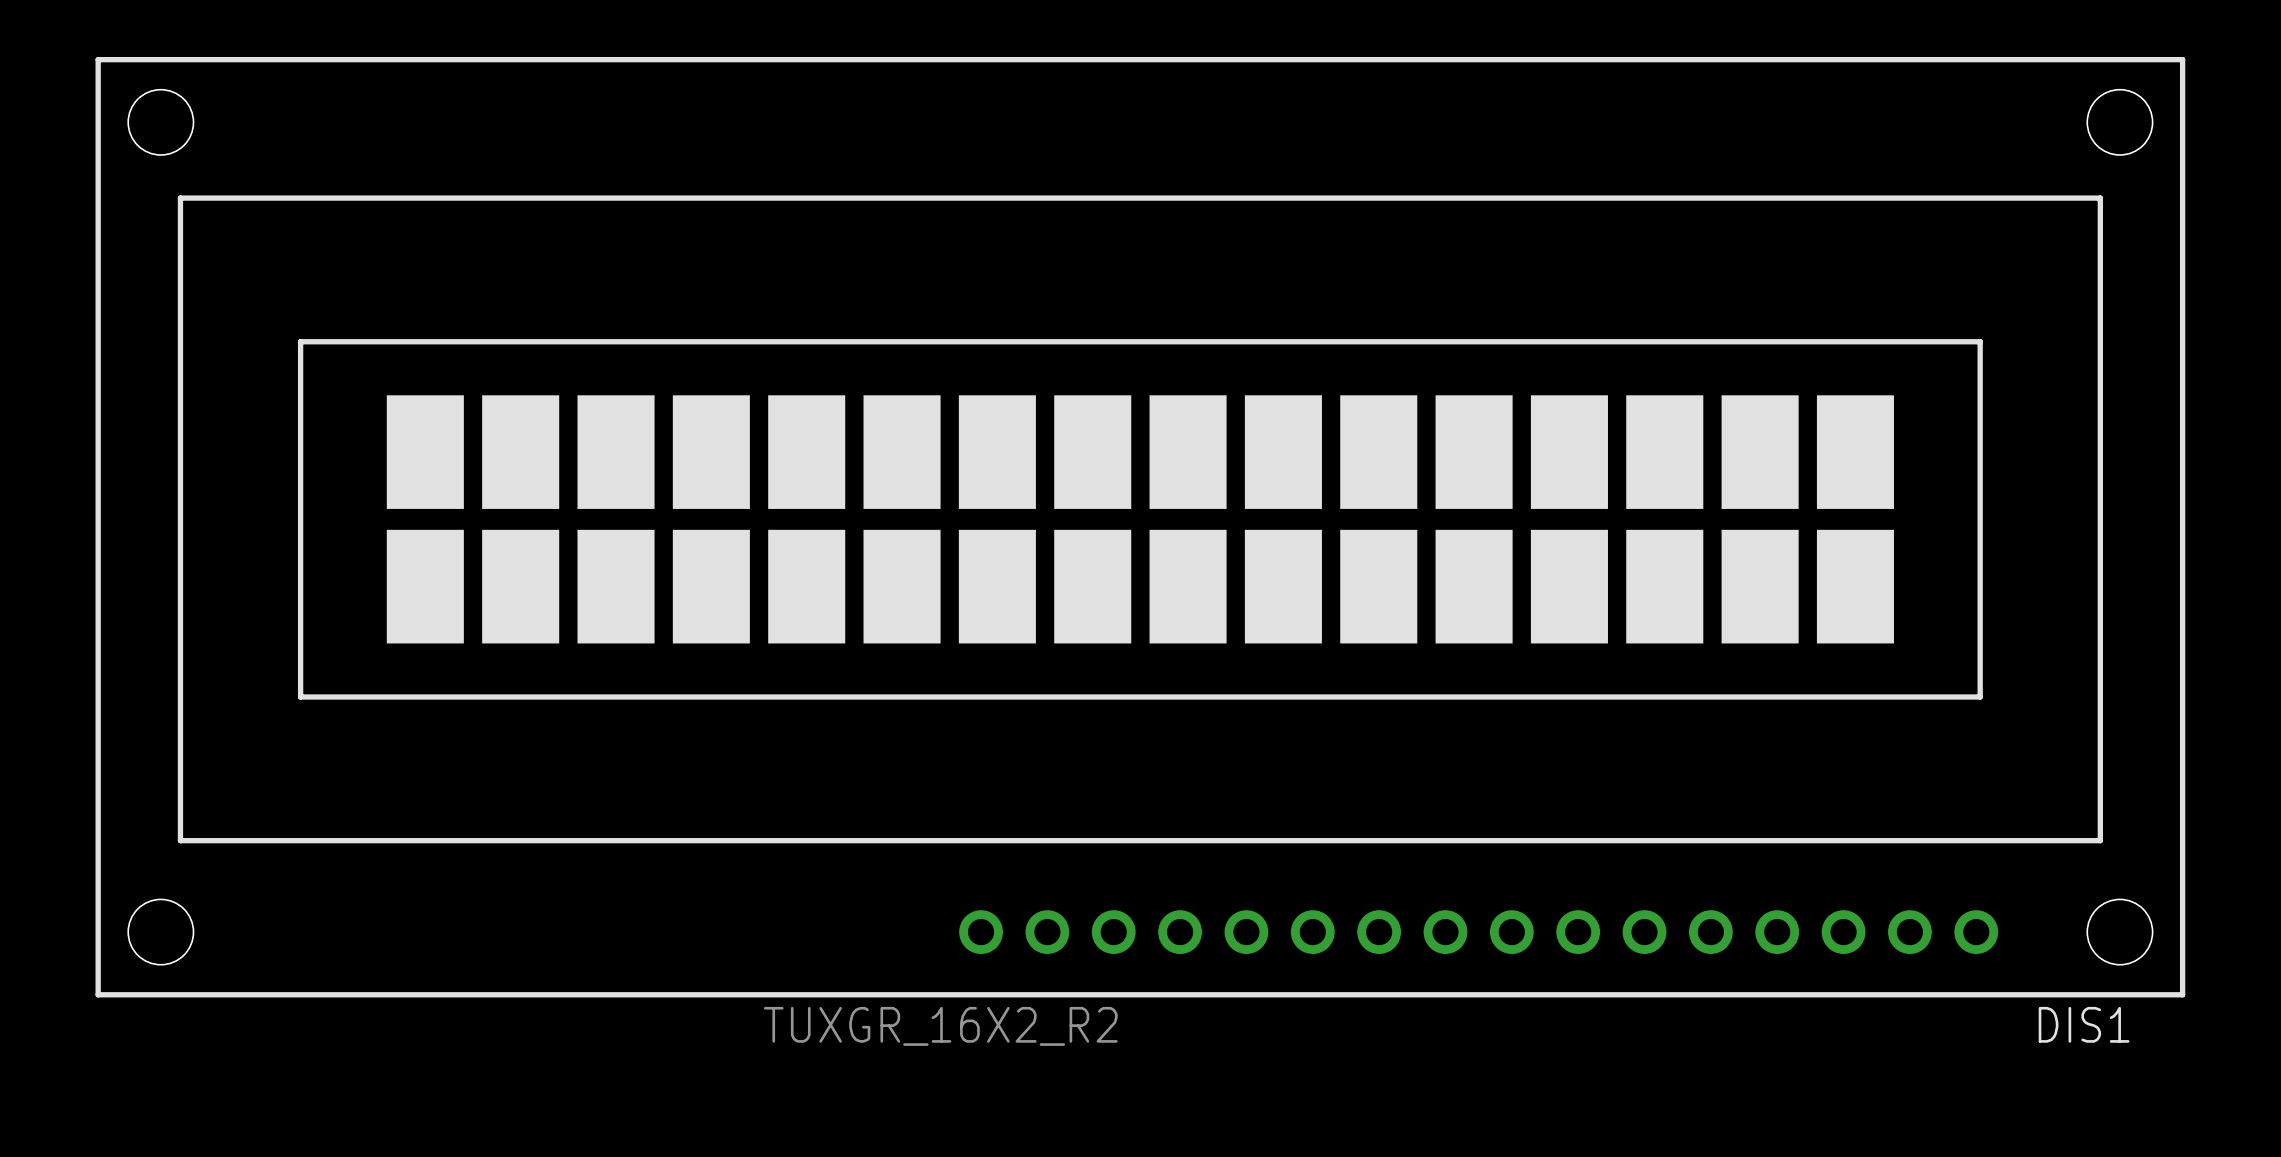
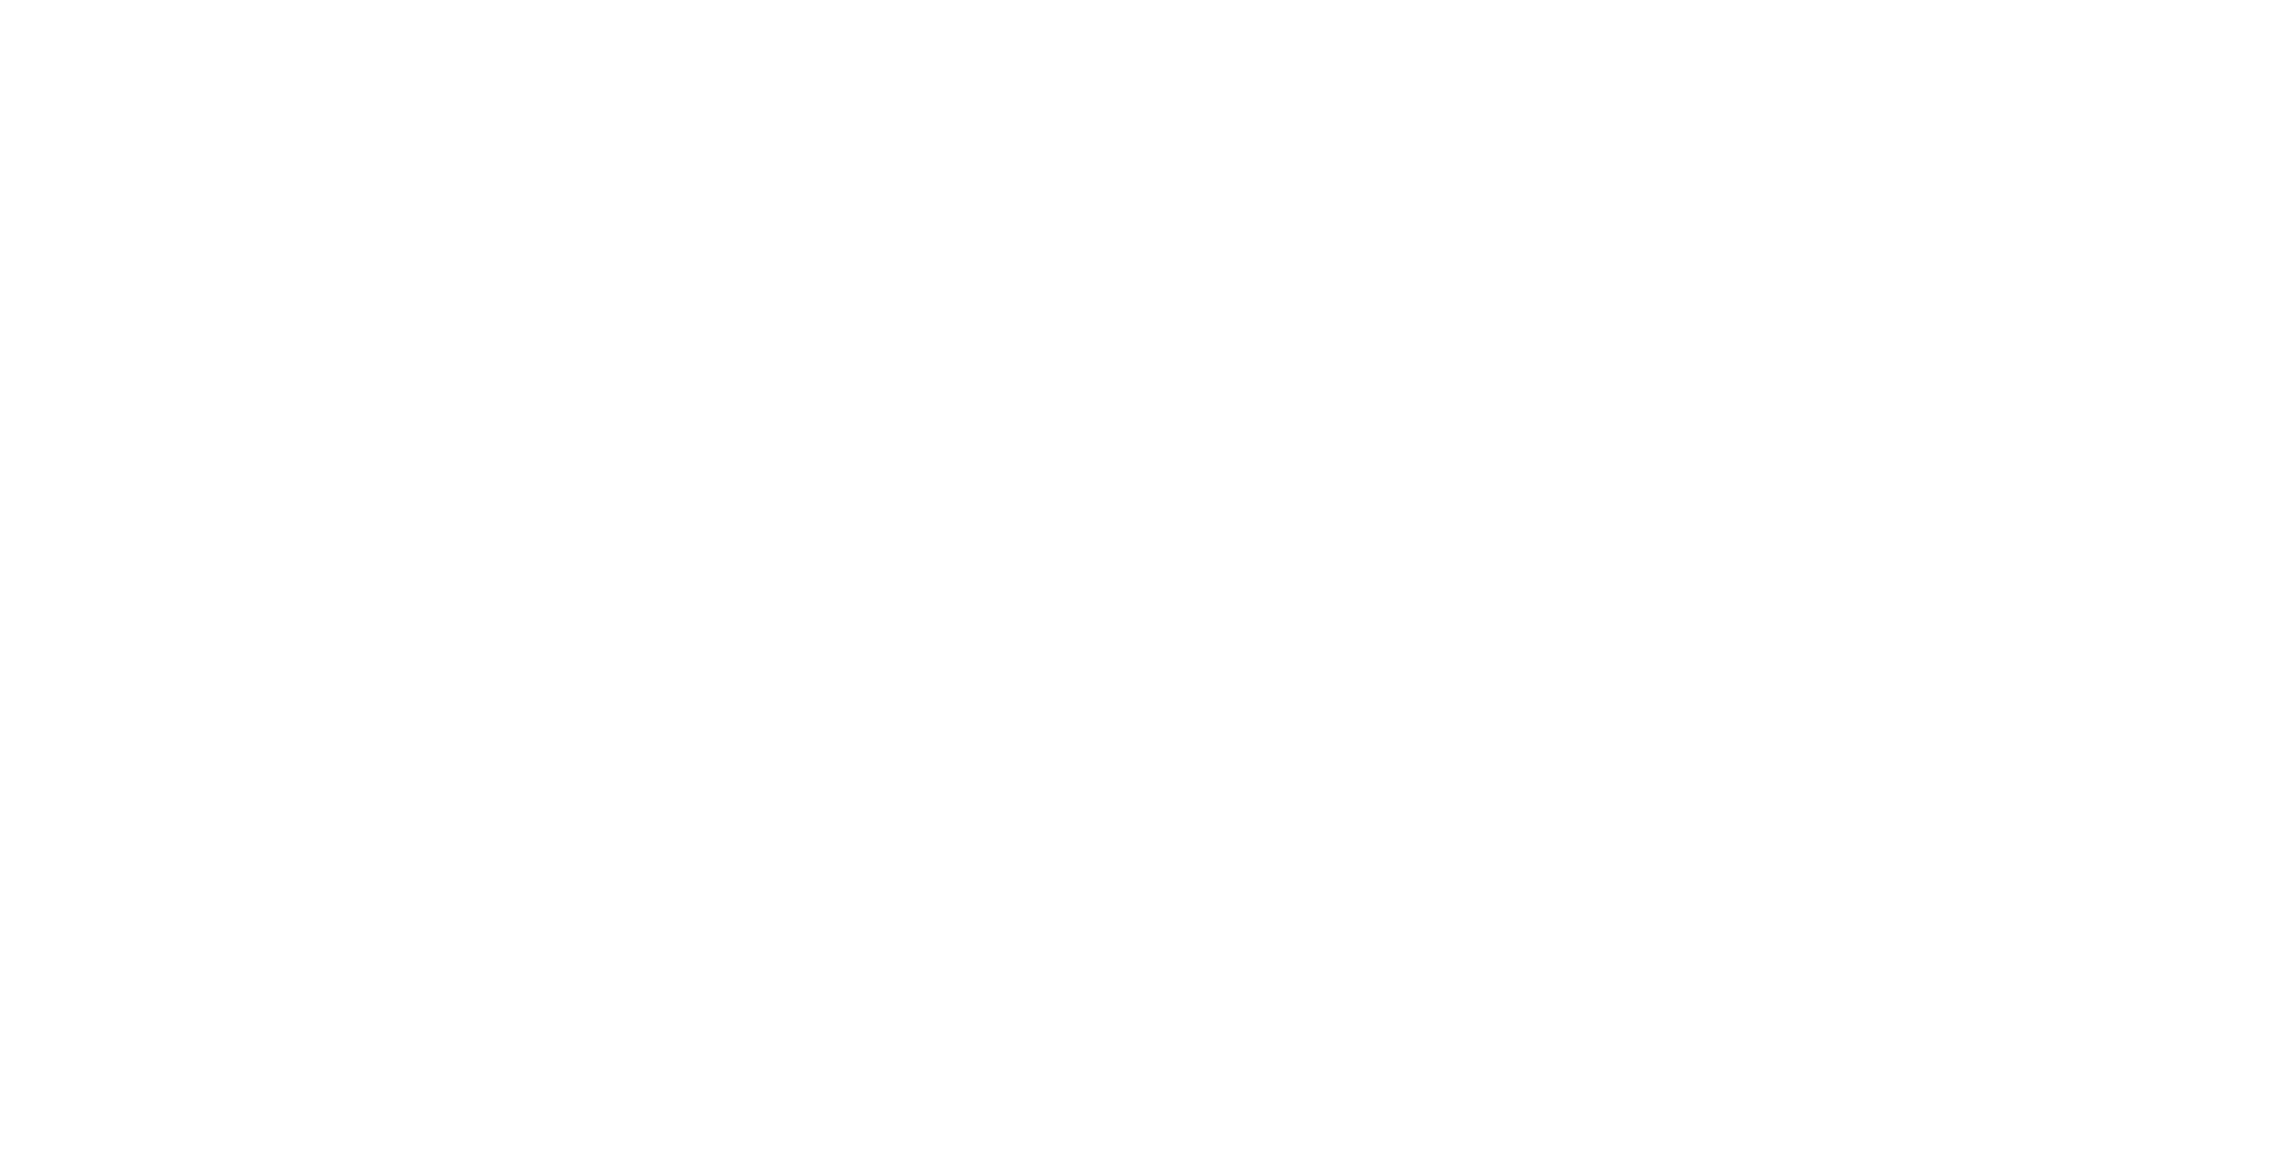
DIS1: TUXGR_16X2_R2 (1140, 527) -> none

